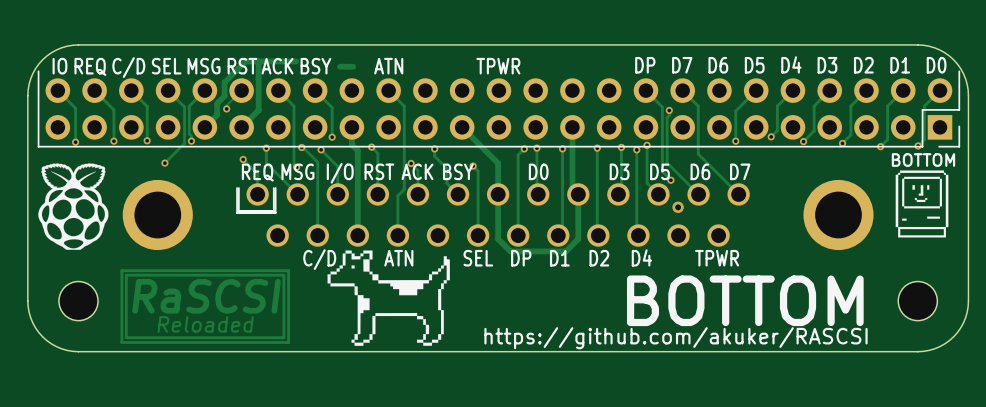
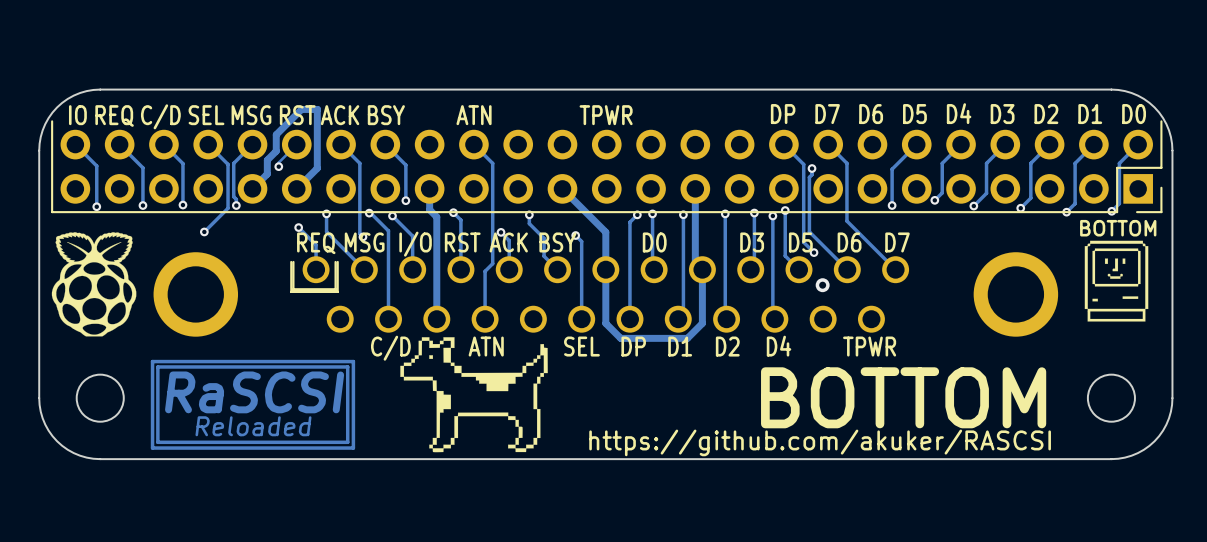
track: (296, 61) (258, 61) -> none
track: (353, 66) (339, 66) -> none

